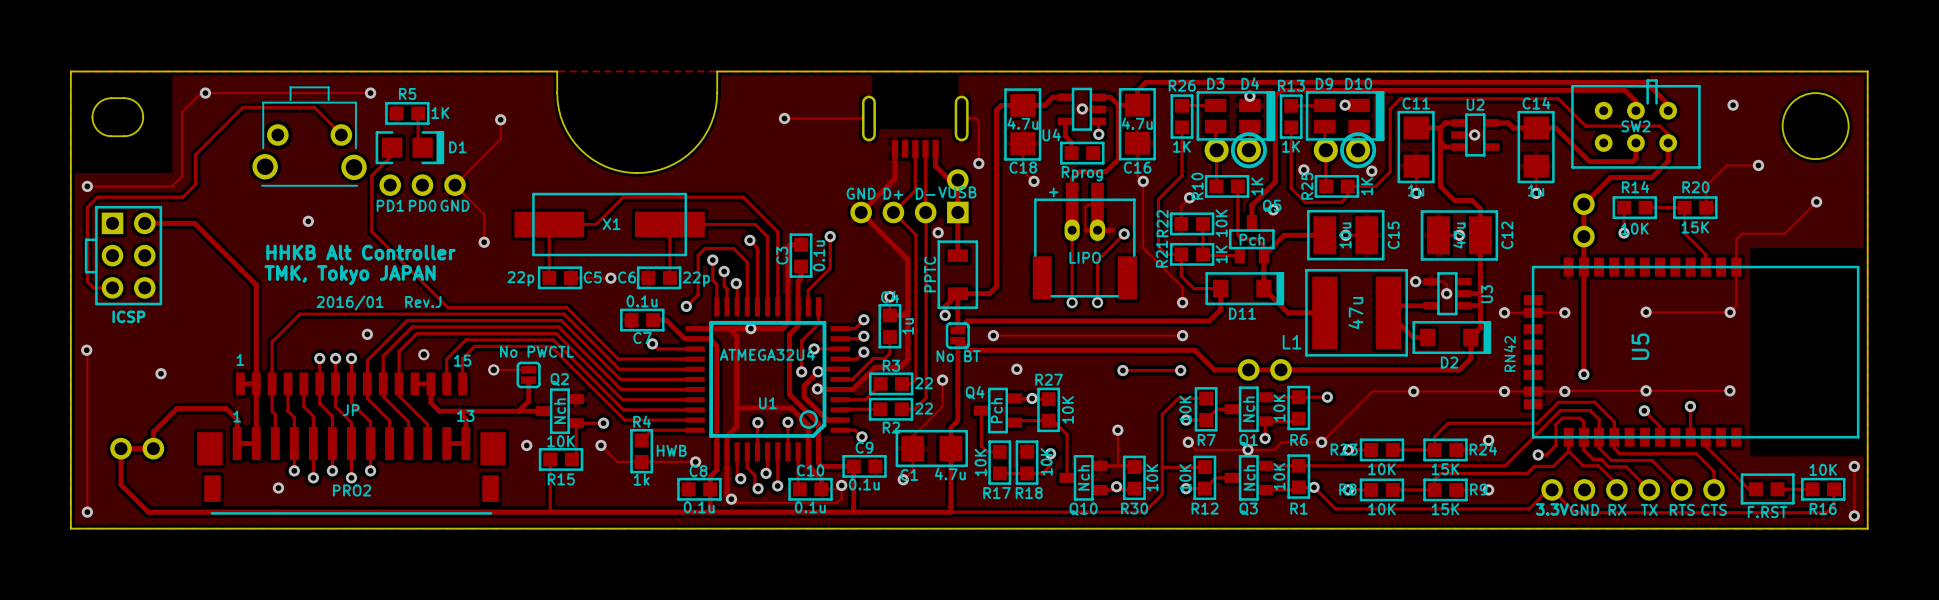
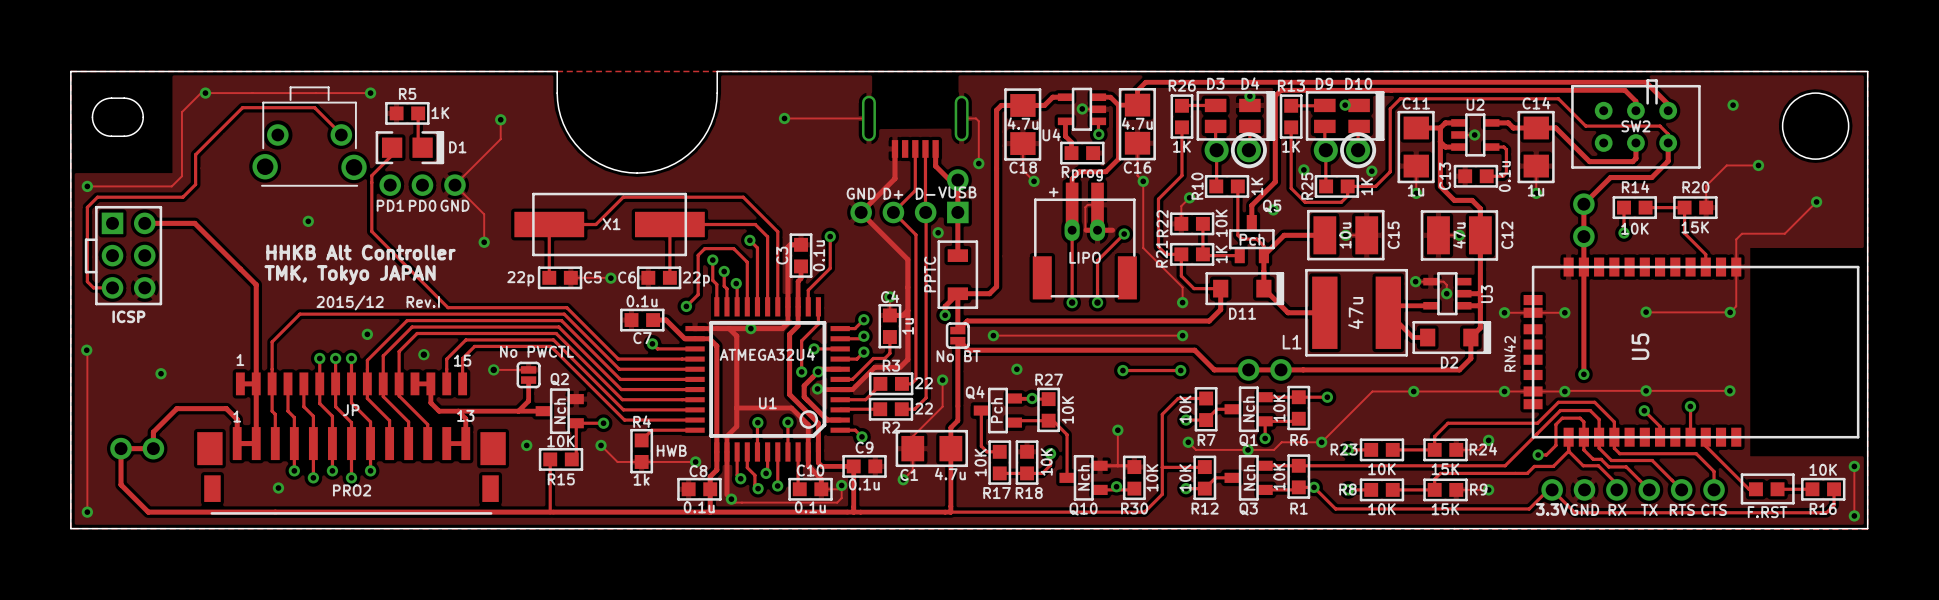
track: none -> (1491, 147) (1503, 147) (1506, 149) (1506, 173) (1503, 176) (1486, 176)
C13: none -> 0.1u (1475, 176)
text: Rev.J (423, 301) -> Rev.I (423, 301)
text: 2016/01 (350, 302) -> 2015/12 (350, 302)

